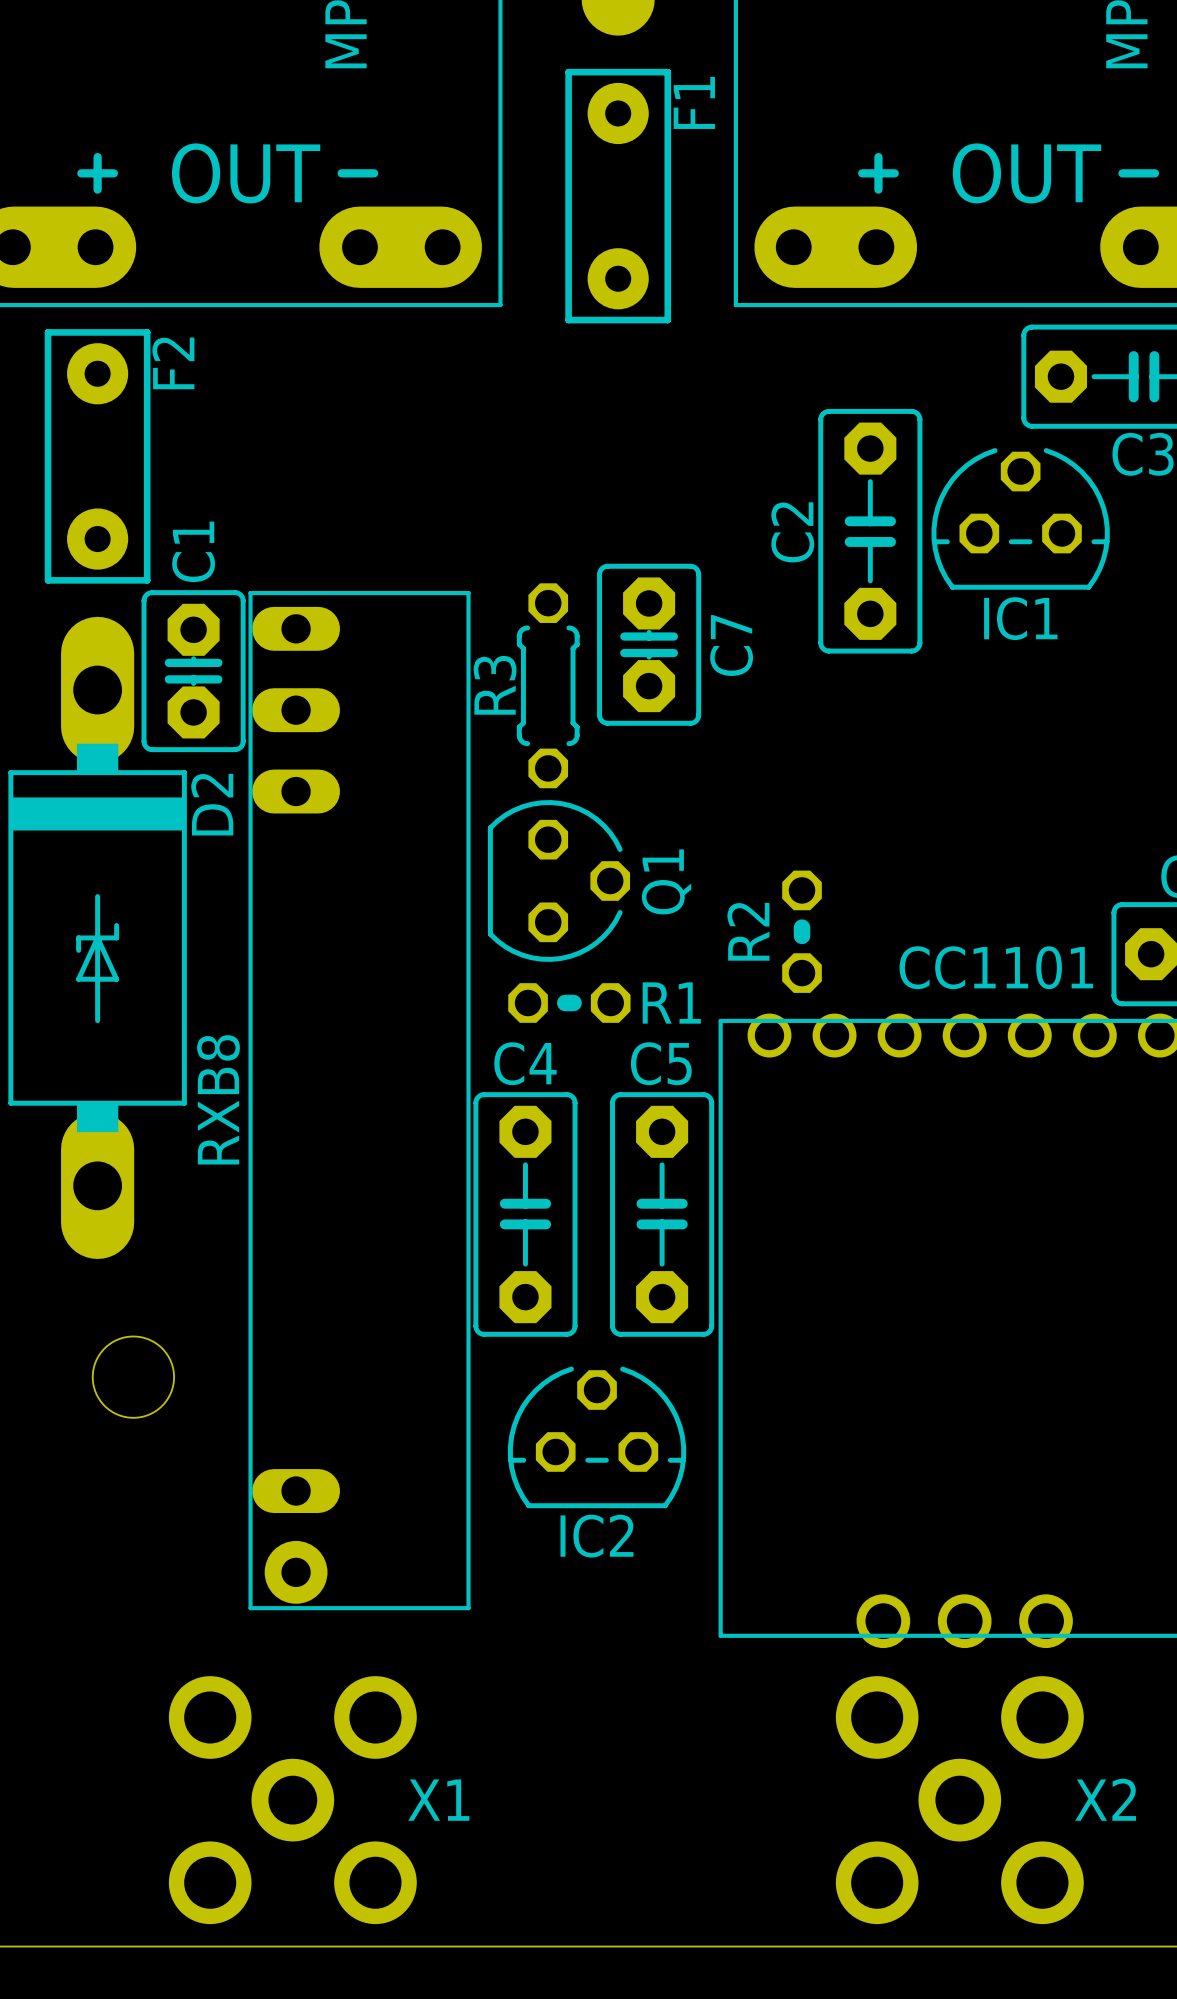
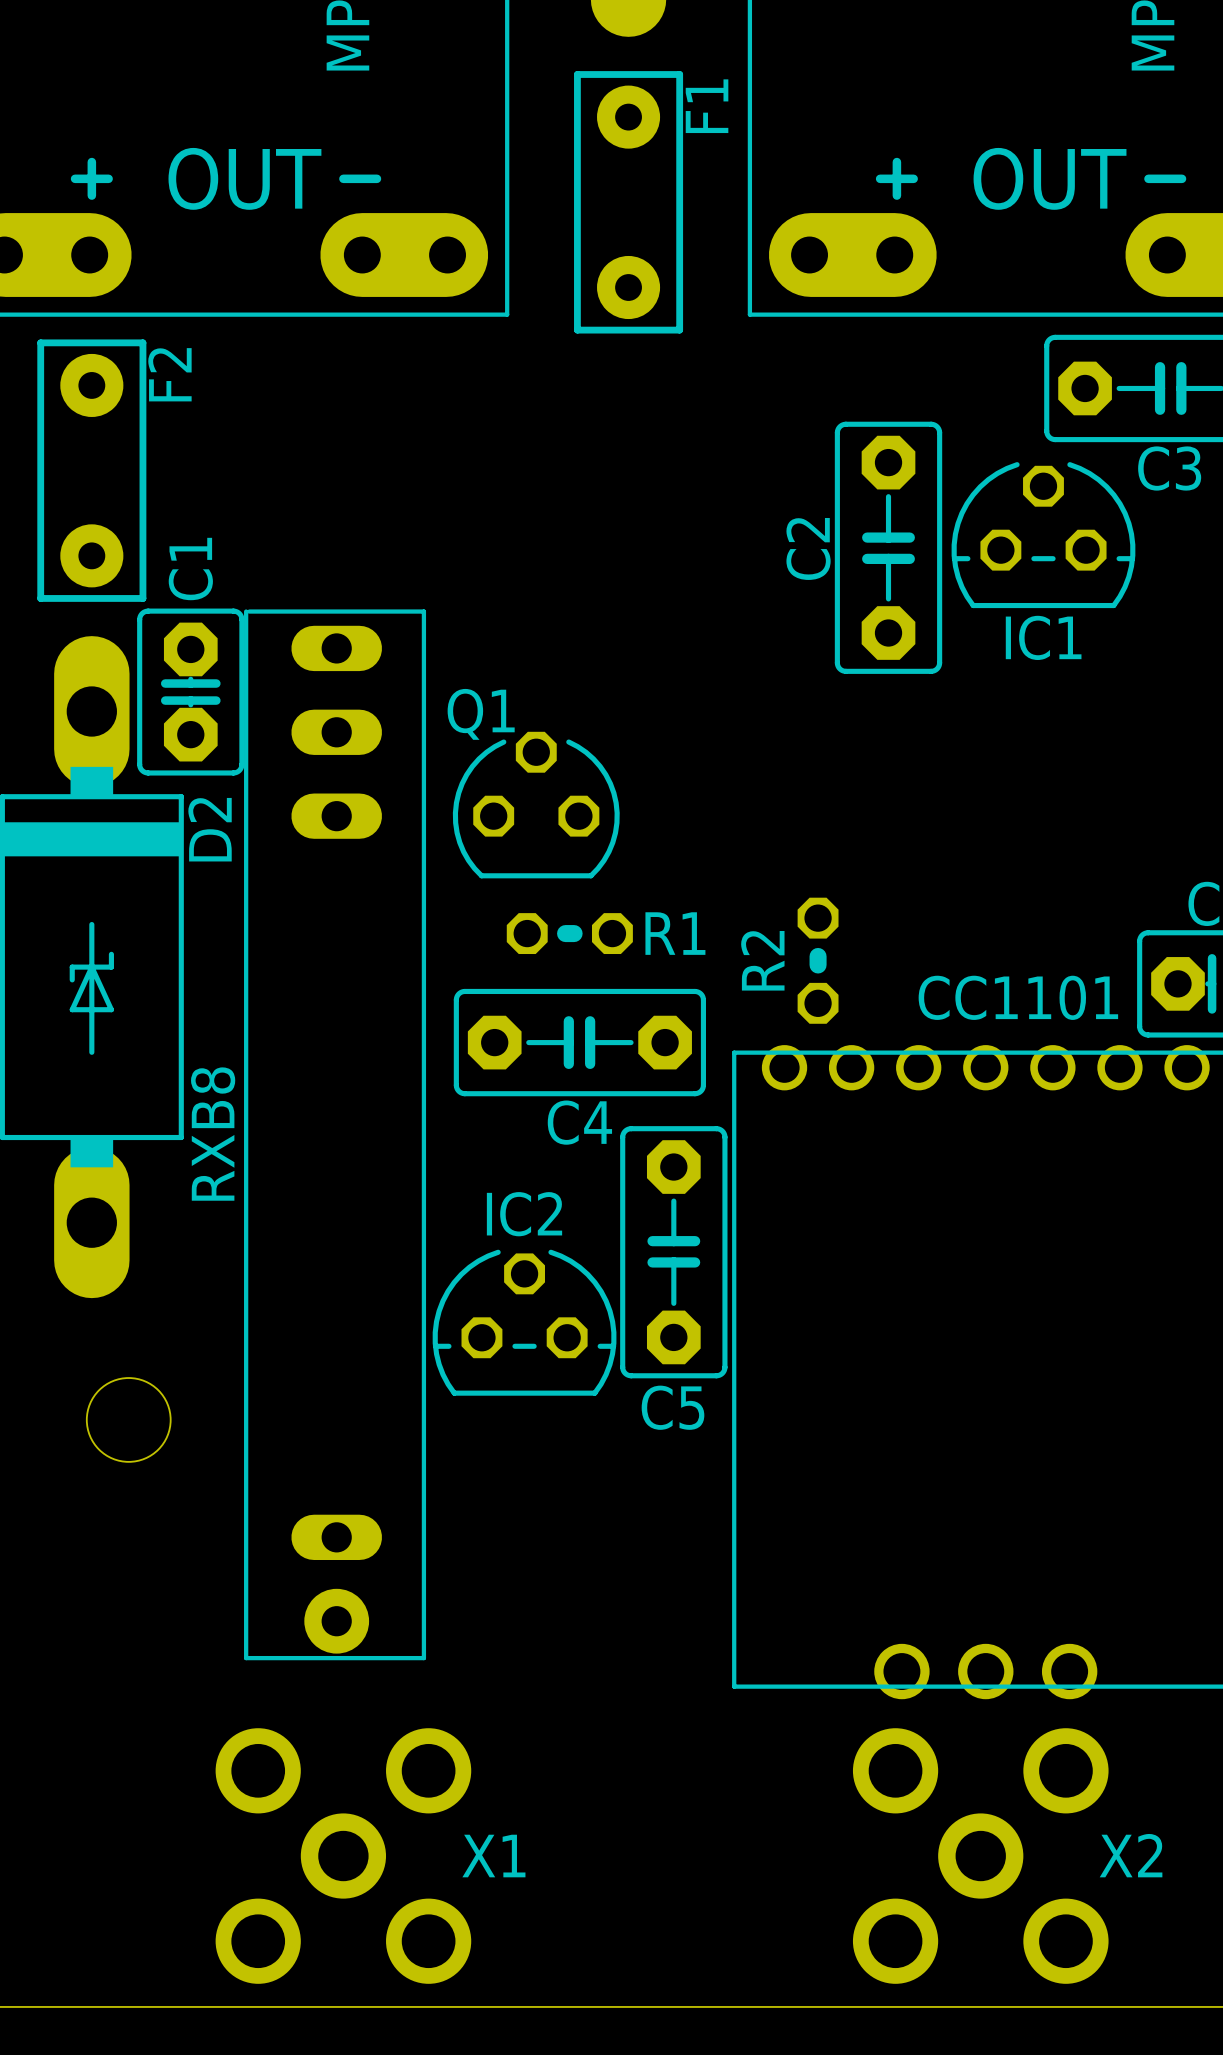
RXB8 footprint: [248, 590, 471, 1611] -> [244, 609, 427, 1661]
C7: (649, 644) -> none
R3: (548, 685) -> none
Q1 rotation: 0° (558, 880) -> 90° counterclockwise (536, 805)
Q1 position: (558, 880) -> (536, 805)
Q1 name position: Q1 (666, 881) -> Q1 (481, 714)
R1 position: (569, 1003) -> (569, 933)
C4 name position: C4 (525, 1063) -> C4 (579, 1122)
C5 name position: C5 (661, 1063) -> C5 (673, 1407)
C4 rotation: 0° (525, 1214) -> 90° counterclockwise (579, 1042)
C4 position: (525, 1214) -> (579, 1042)
IC2 position: (597, 1437) -> (524, 1322)
IC2 name position: IC2 (596, 1536) -> IC2 (524, 1214)
X1 position: (292, 1800) -> (343, 1856)

